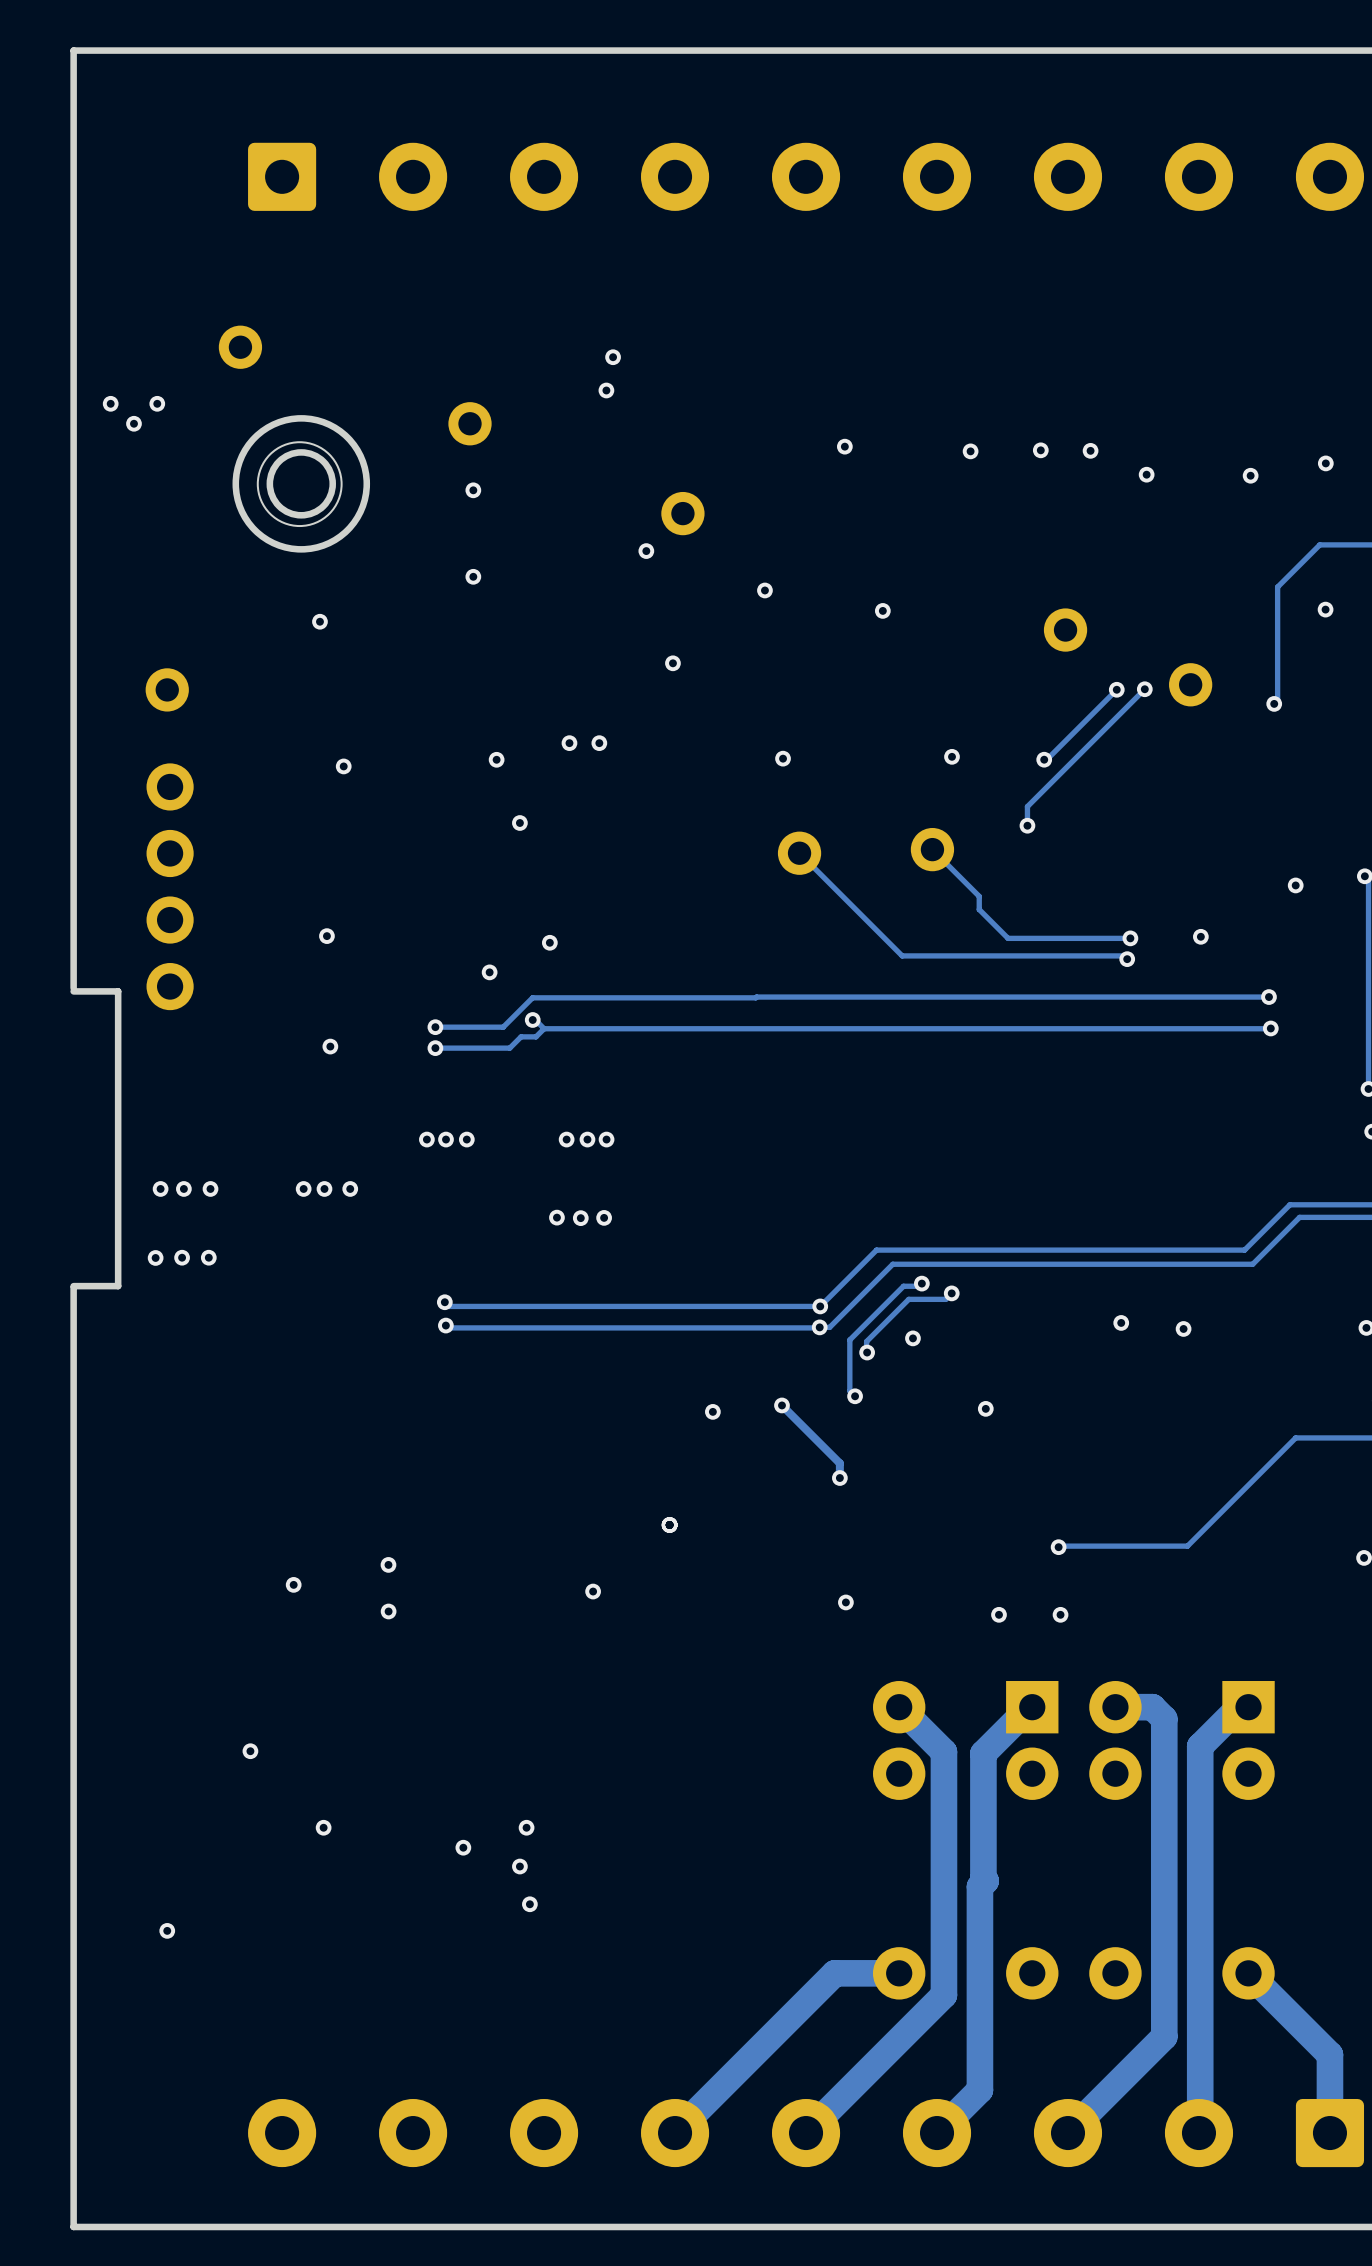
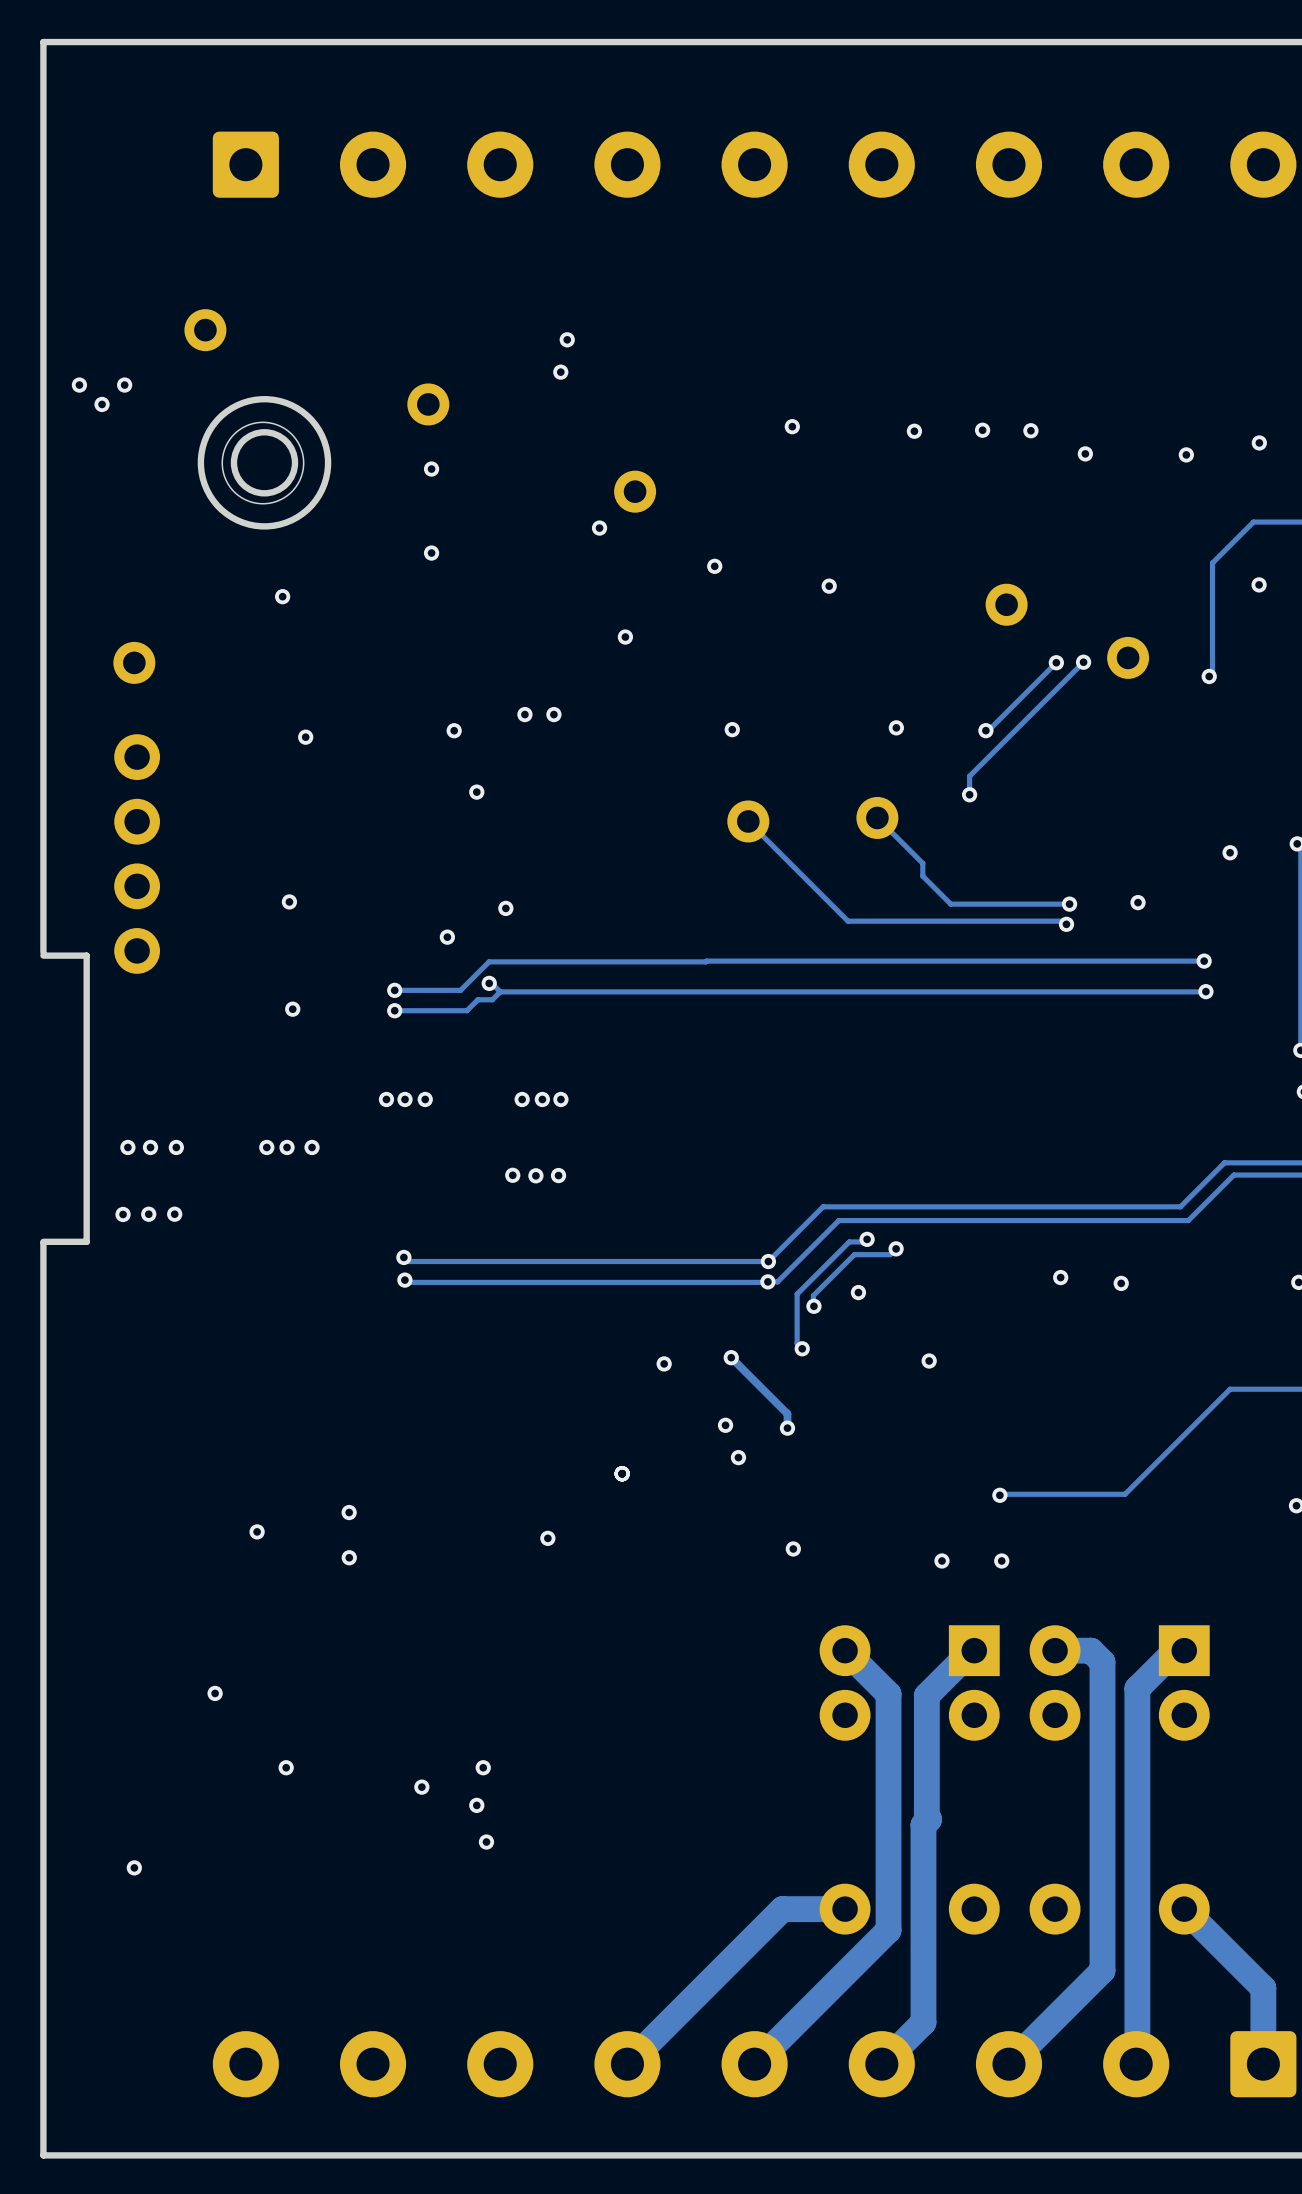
via: none -> (725, 1425)
via: none -> (738, 1457)

